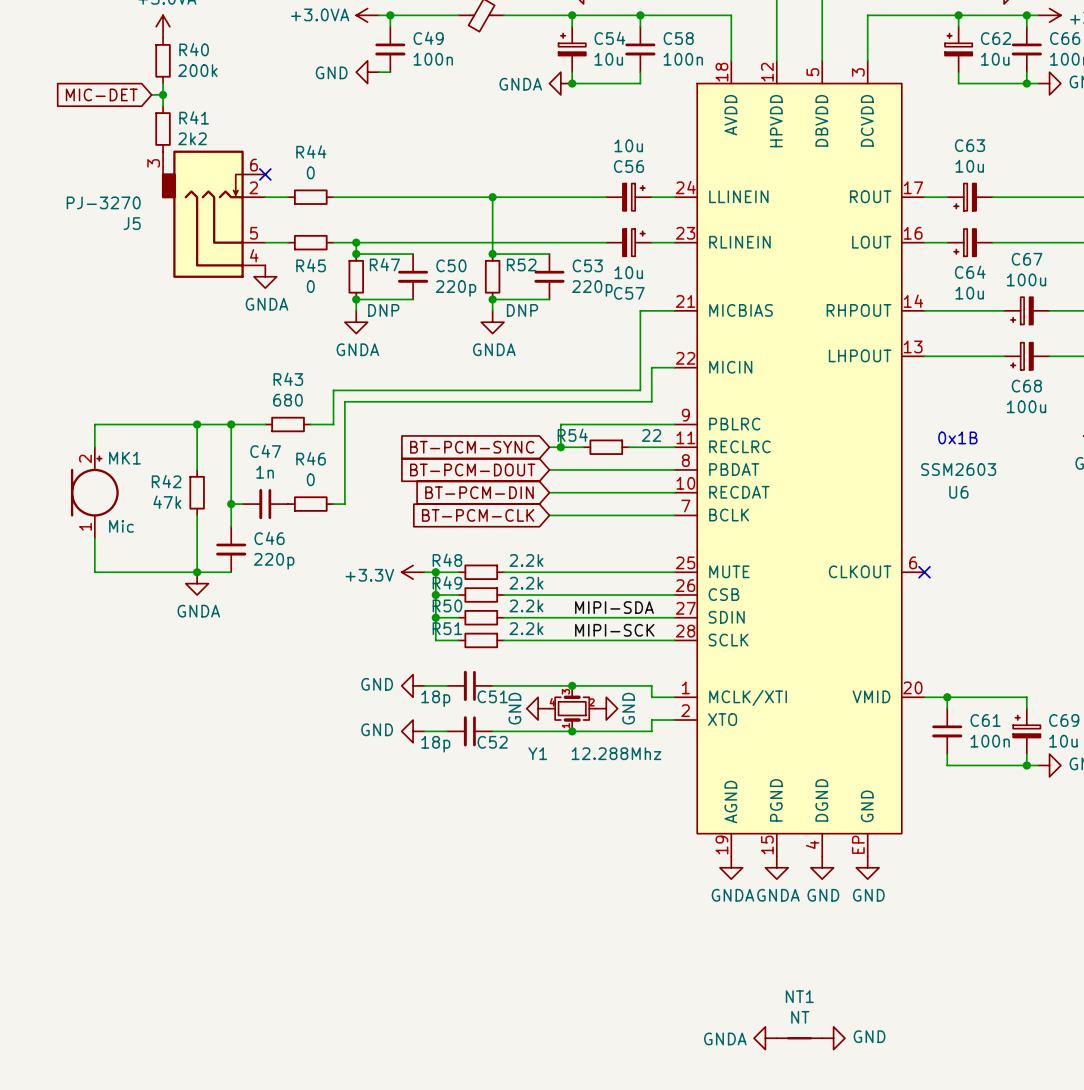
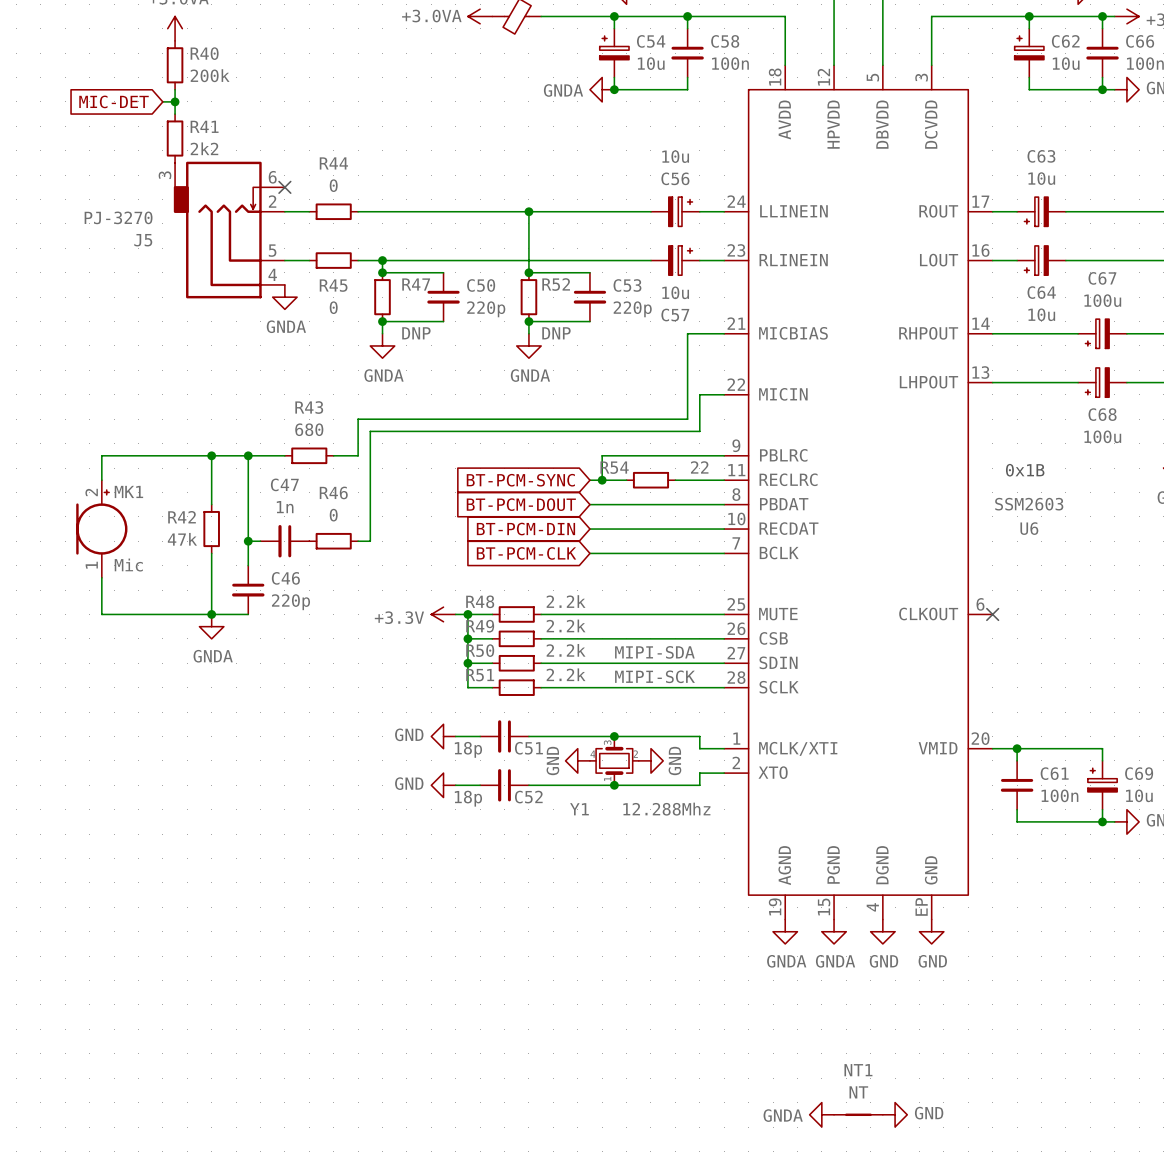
power symbol position: +3.0VA (367, 15) -> +3.0VA (480, 16)
wire: (378, 15) (458, 15) -> none
wire: (390, 15) (390, 26) -> none
junction: (390, 15) -> none
C49: 100n (390, 49) -> none
power symbol: GND (367, 72) -> none
wire: (378, 72) (390, 72) -> none

